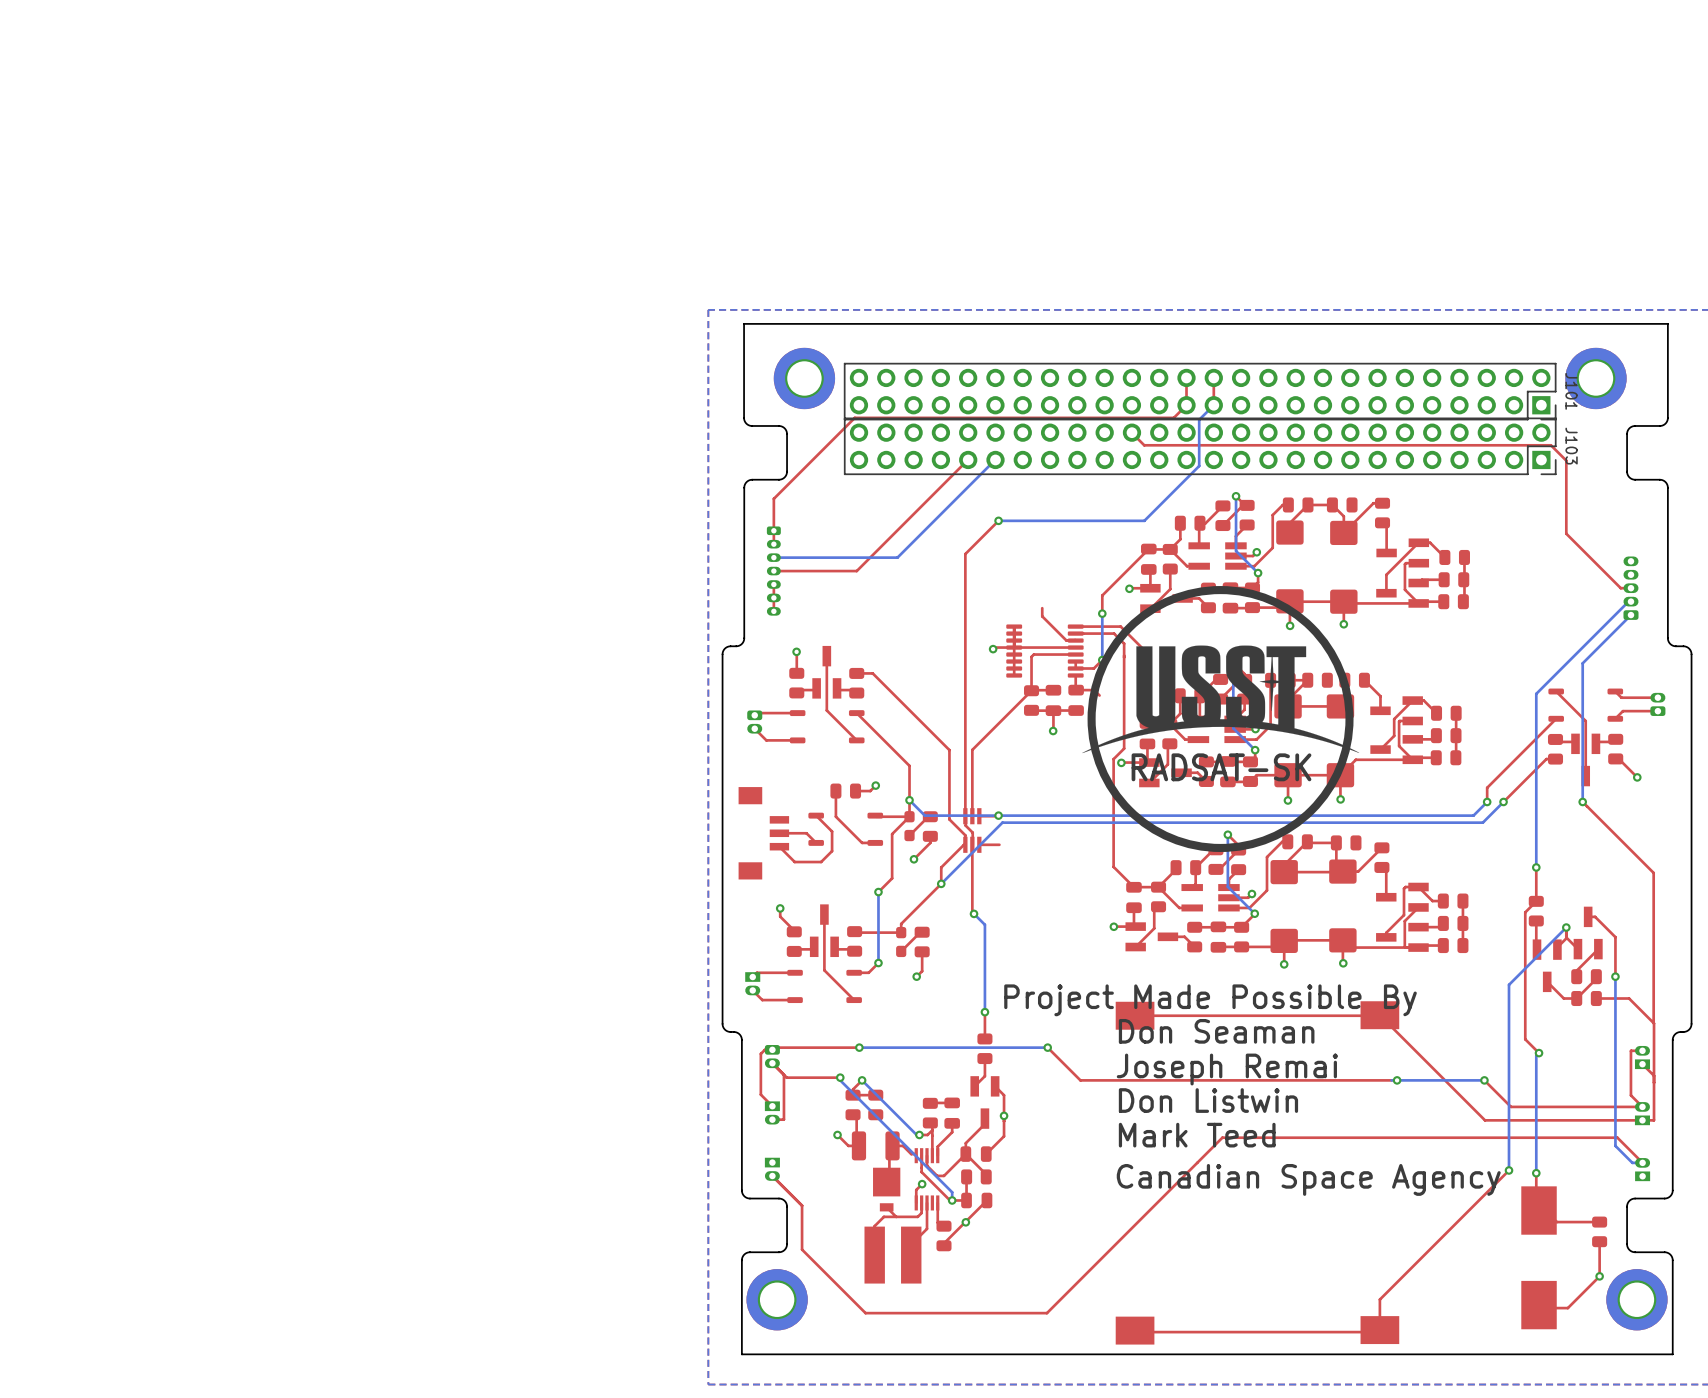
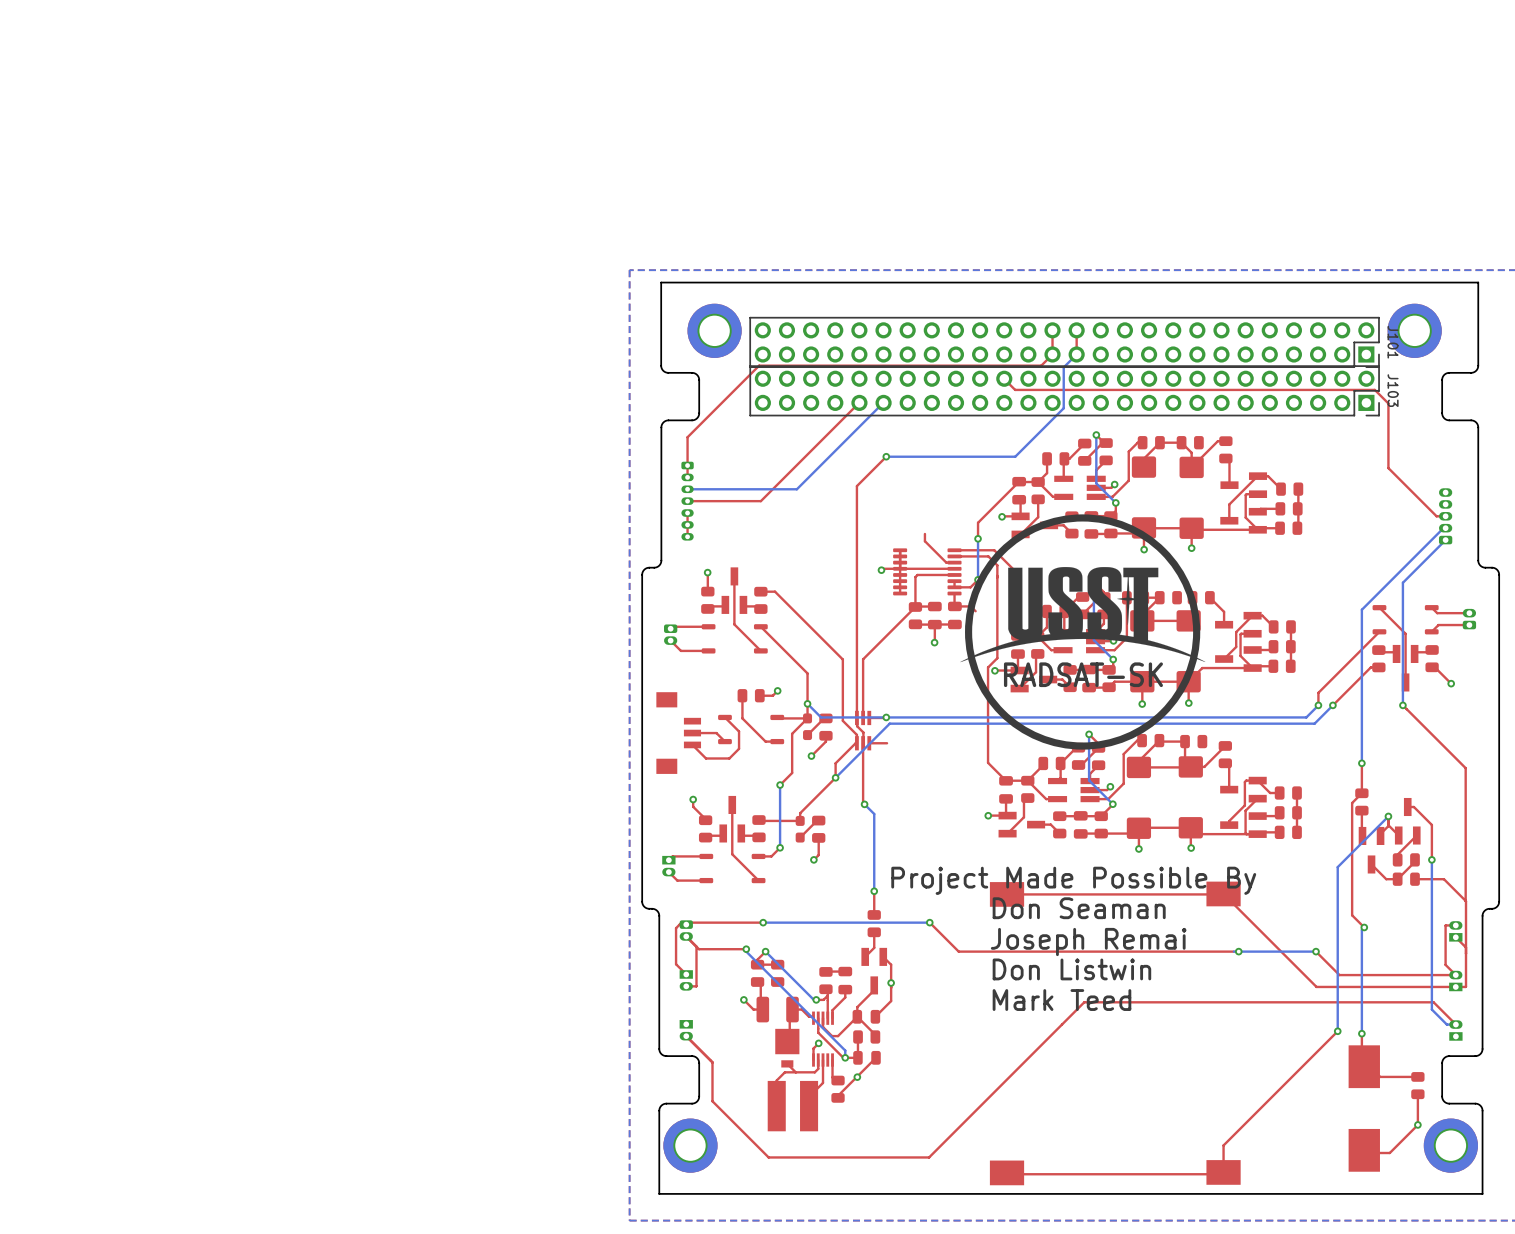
text: Canadian Space Agency (1308, 1179) -> none

